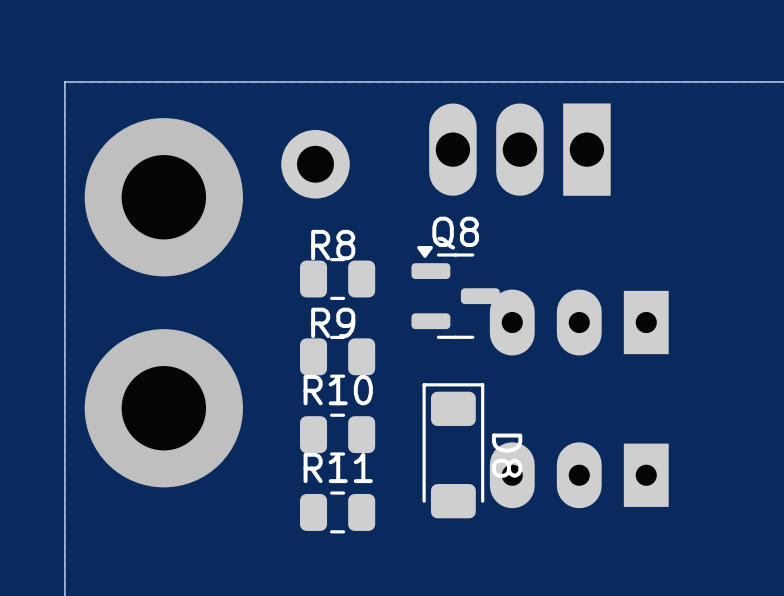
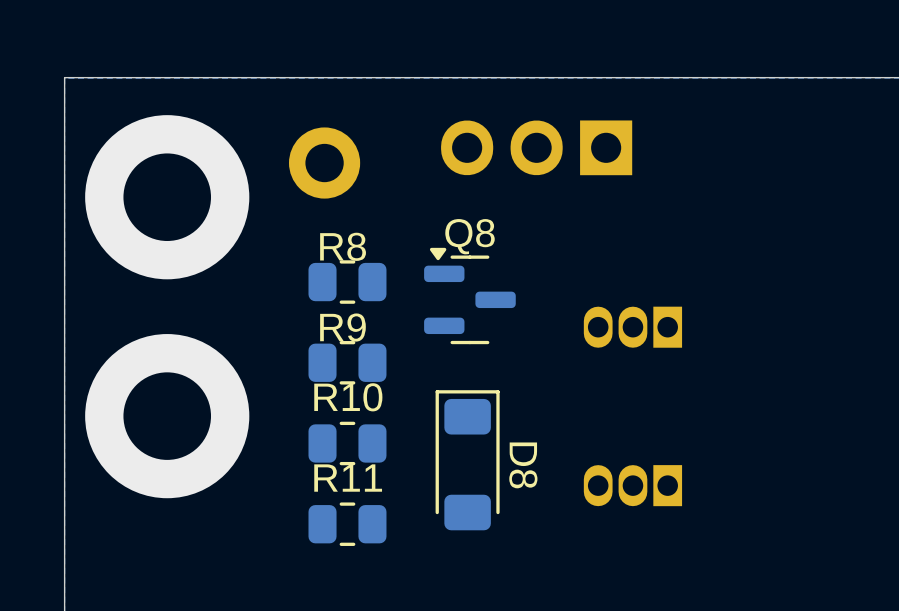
part footprint: [429, 103, 611, 196] -> [441, 120, 633, 176]
part: (579, 322) -> none
part: none -> (632, 327)
part: (579, 475) -> none
part: none -> (632, 485)

